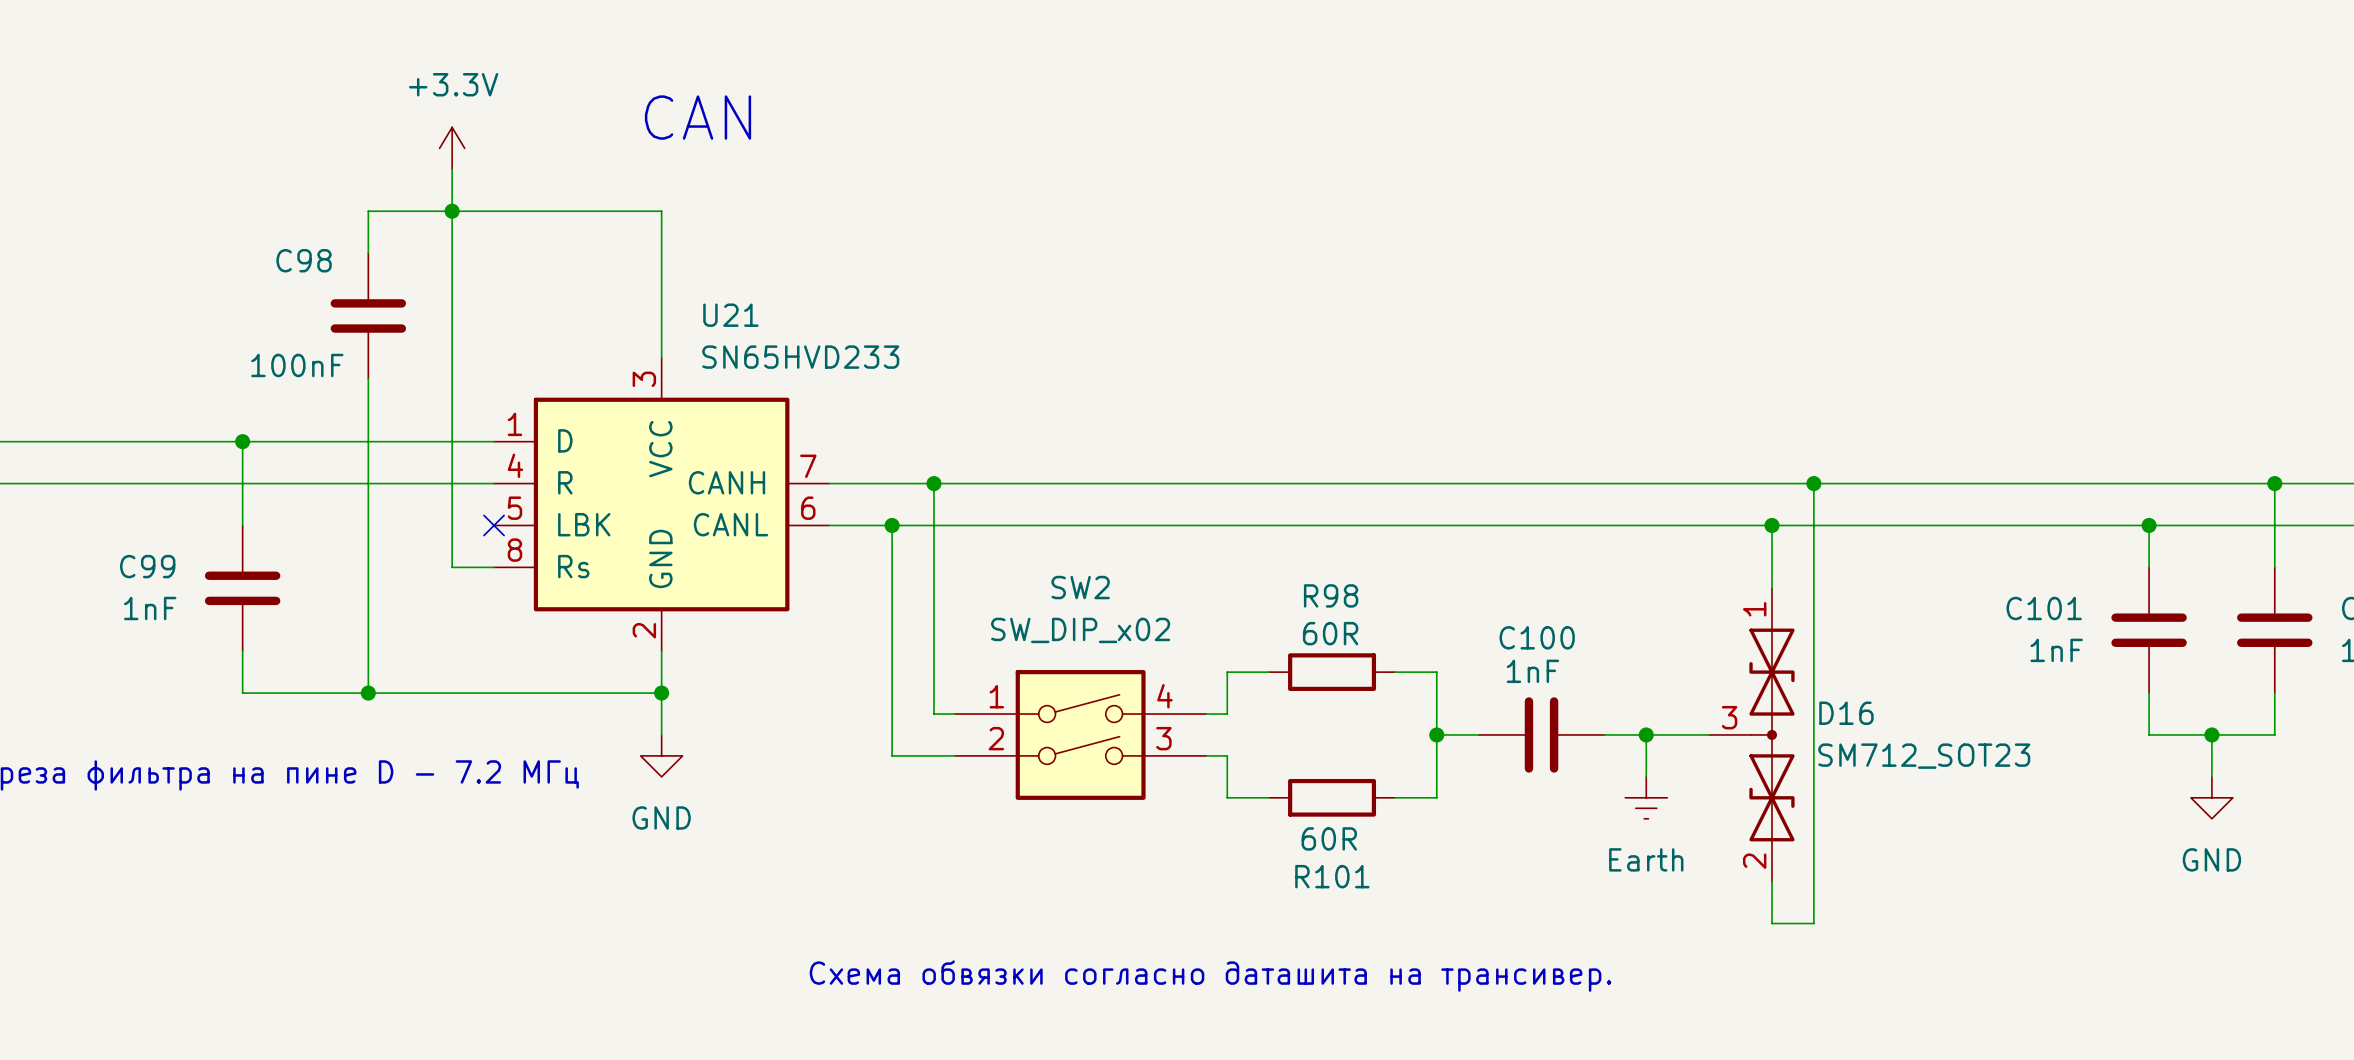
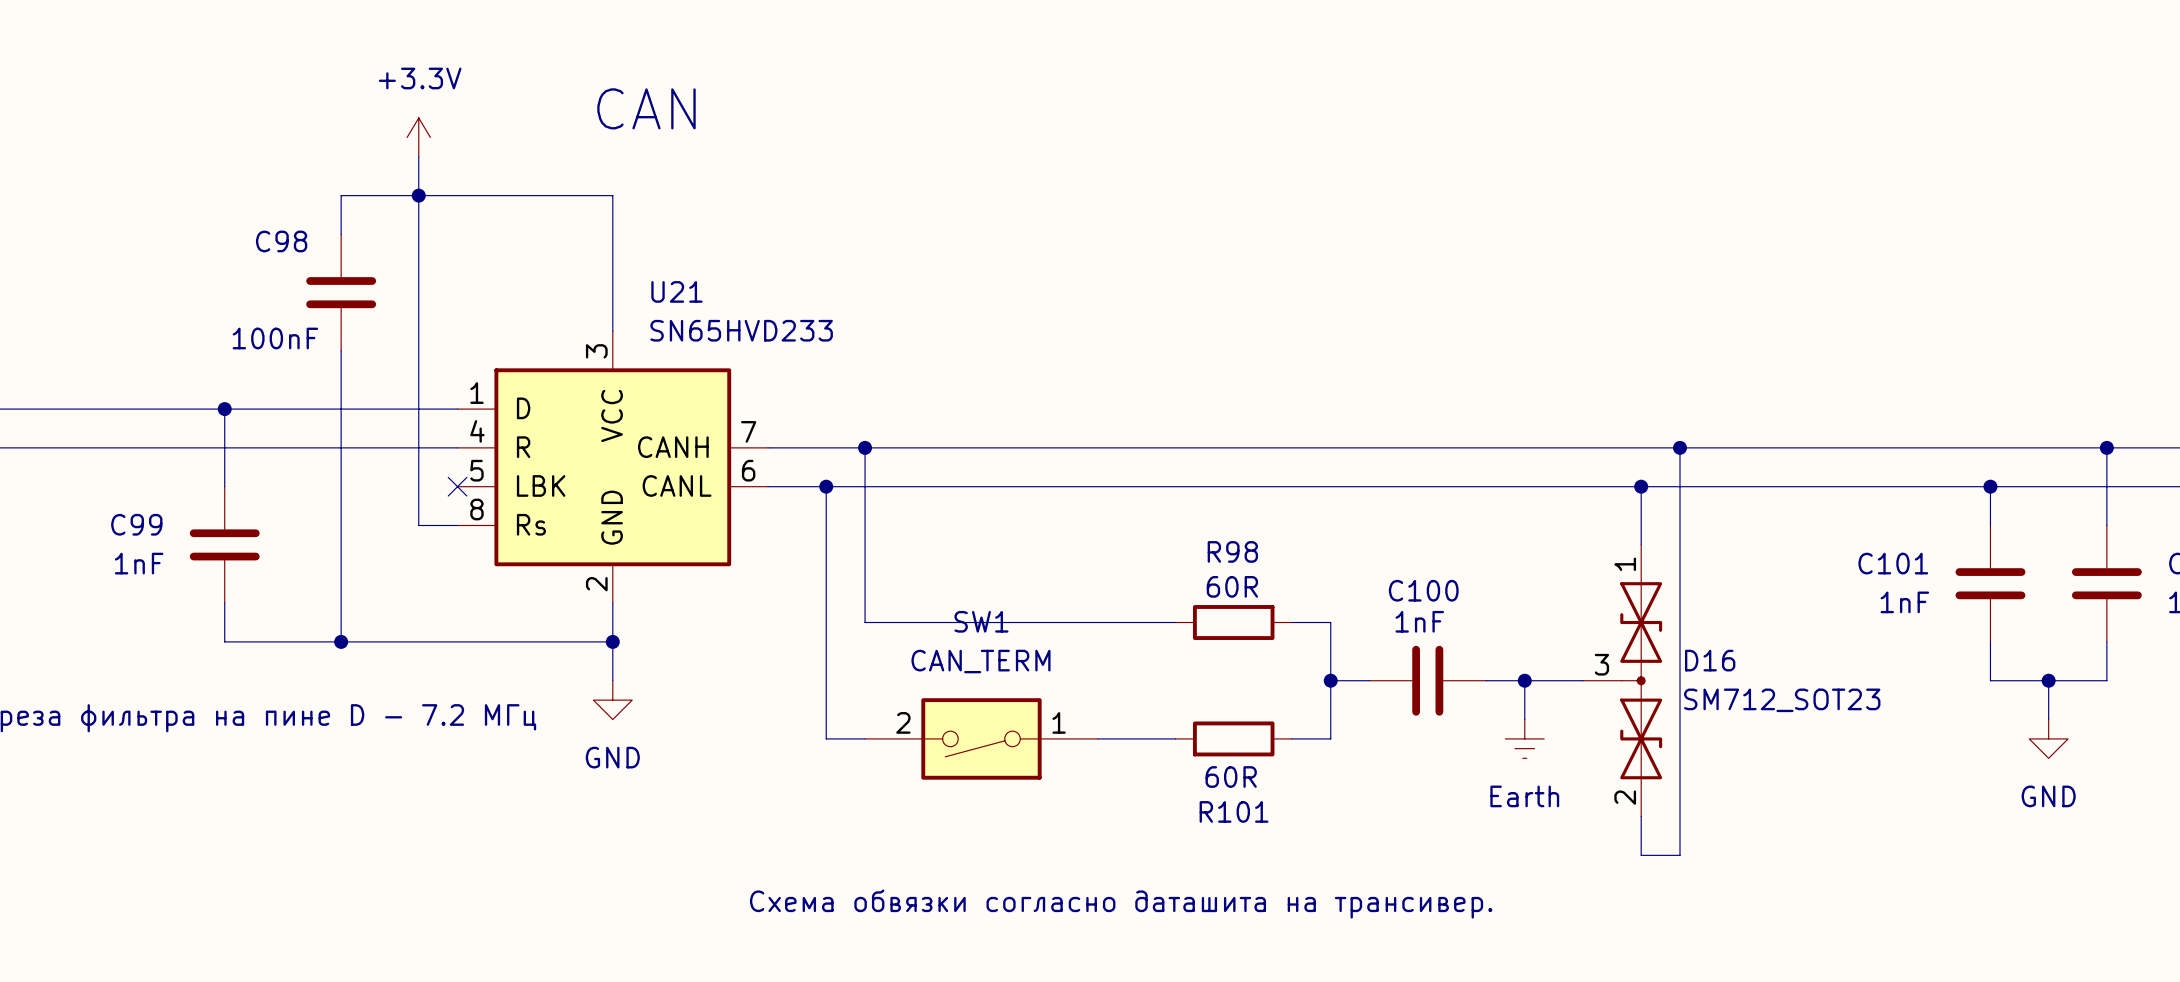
wire: (933, 672) (933, 714) (954, 714) -> (865, 622) (1136, 622)
wire: (1227, 672) (1227, 714) (1206, 714) -> none
SW2: SW_DIP_x02 (1080, 734) -> none
wire: (892, 755) (954, 755) -> (826, 700) (826, 738) (865, 738)
wire: (1206, 755) (1227, 755) (1227, 797) -> (1097, 738) (1136, 738)
SW1: none -> CAN_TERM (981, 738)

